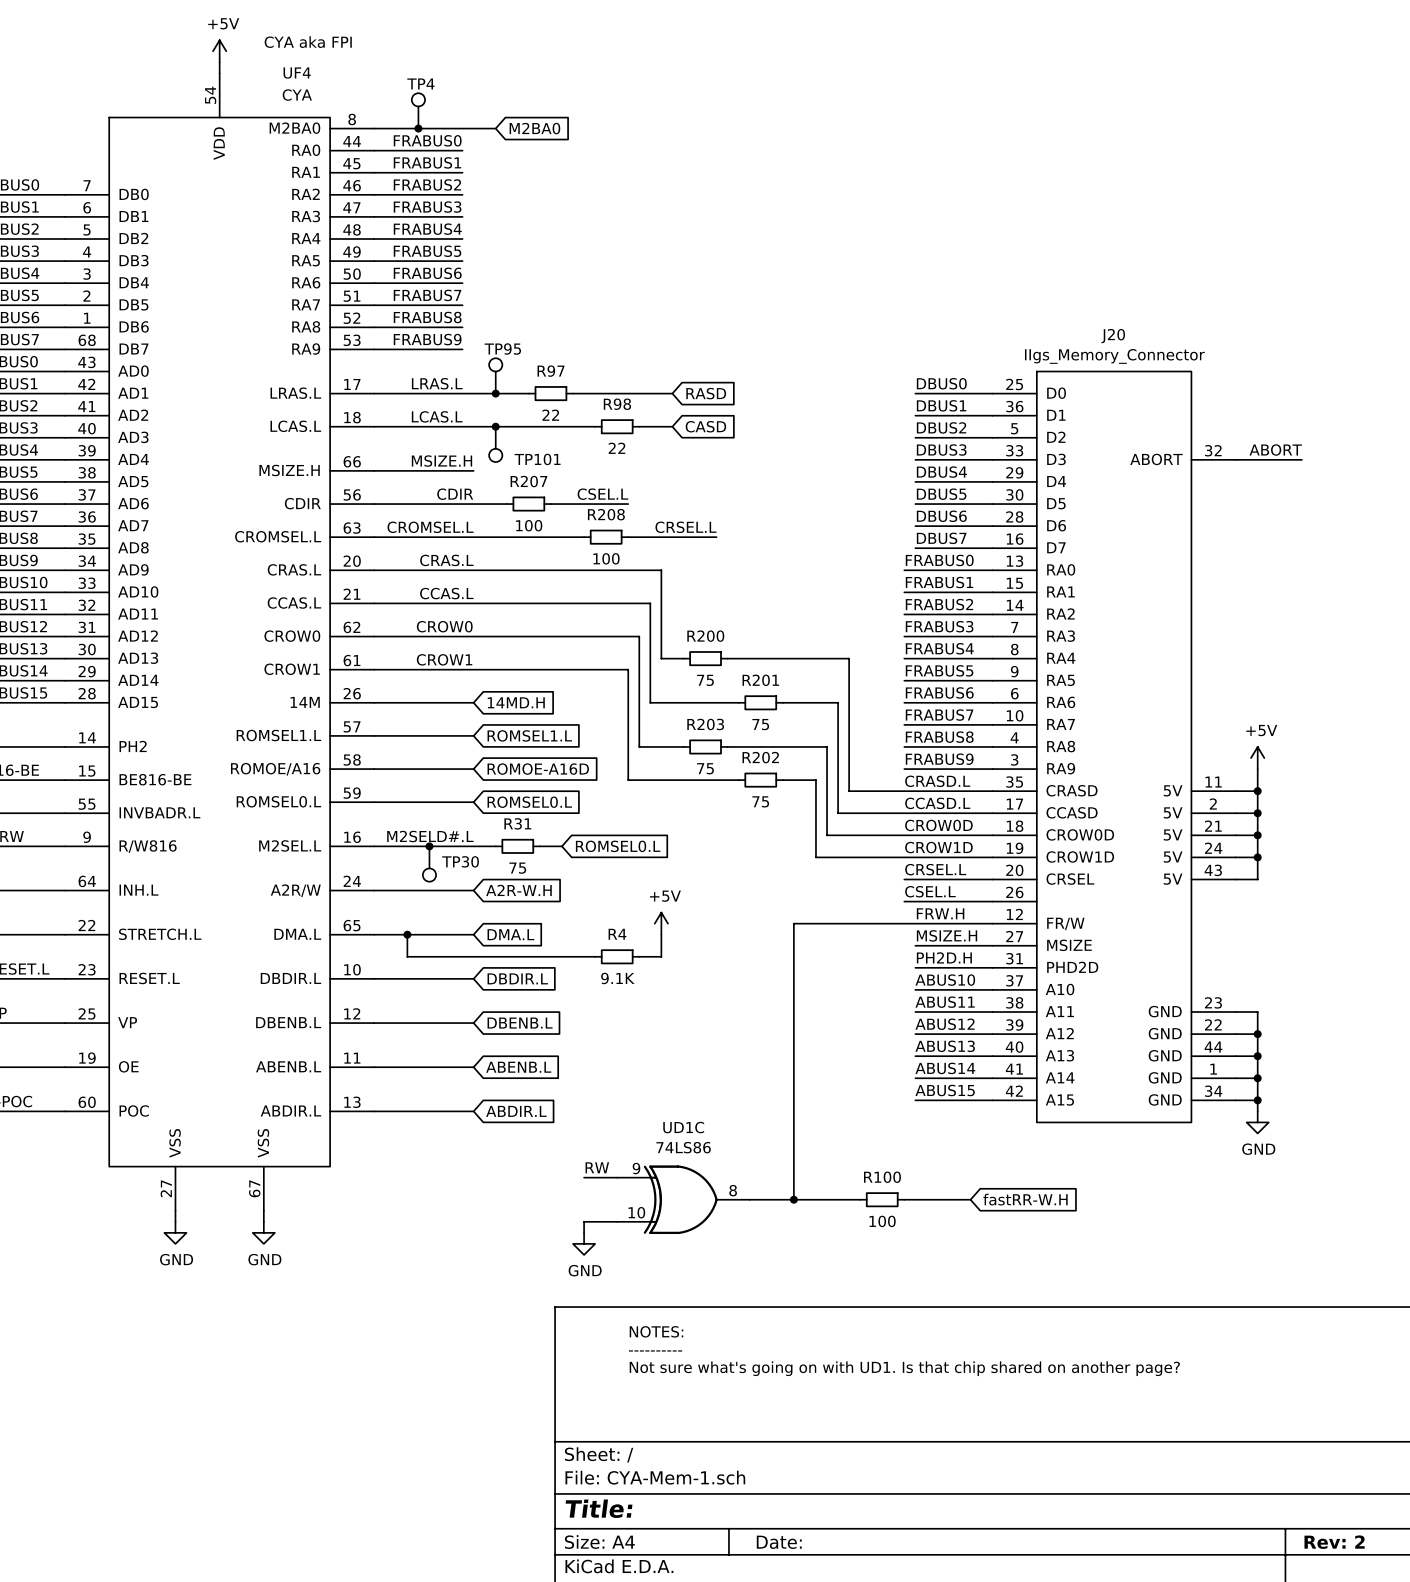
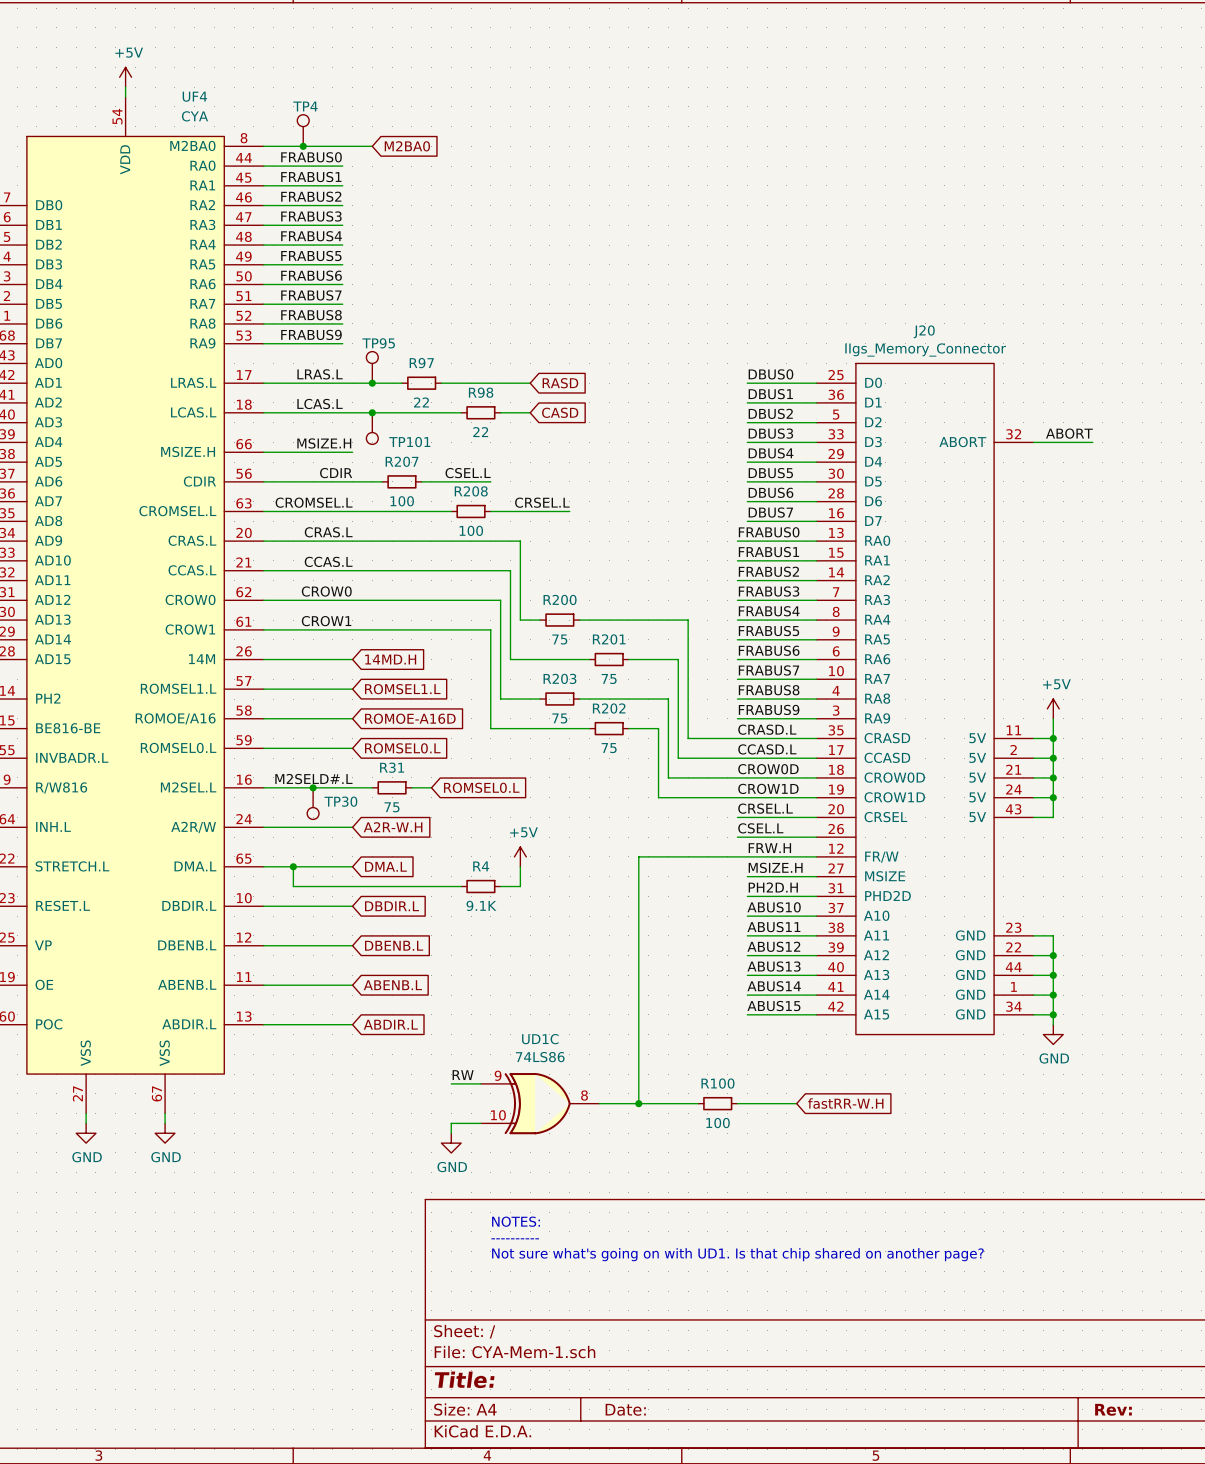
text: CYA aka FPI (308, 42) -> none
title block: Rev: 2 (1334, 1542) -> Rev: (1113, 1409)

